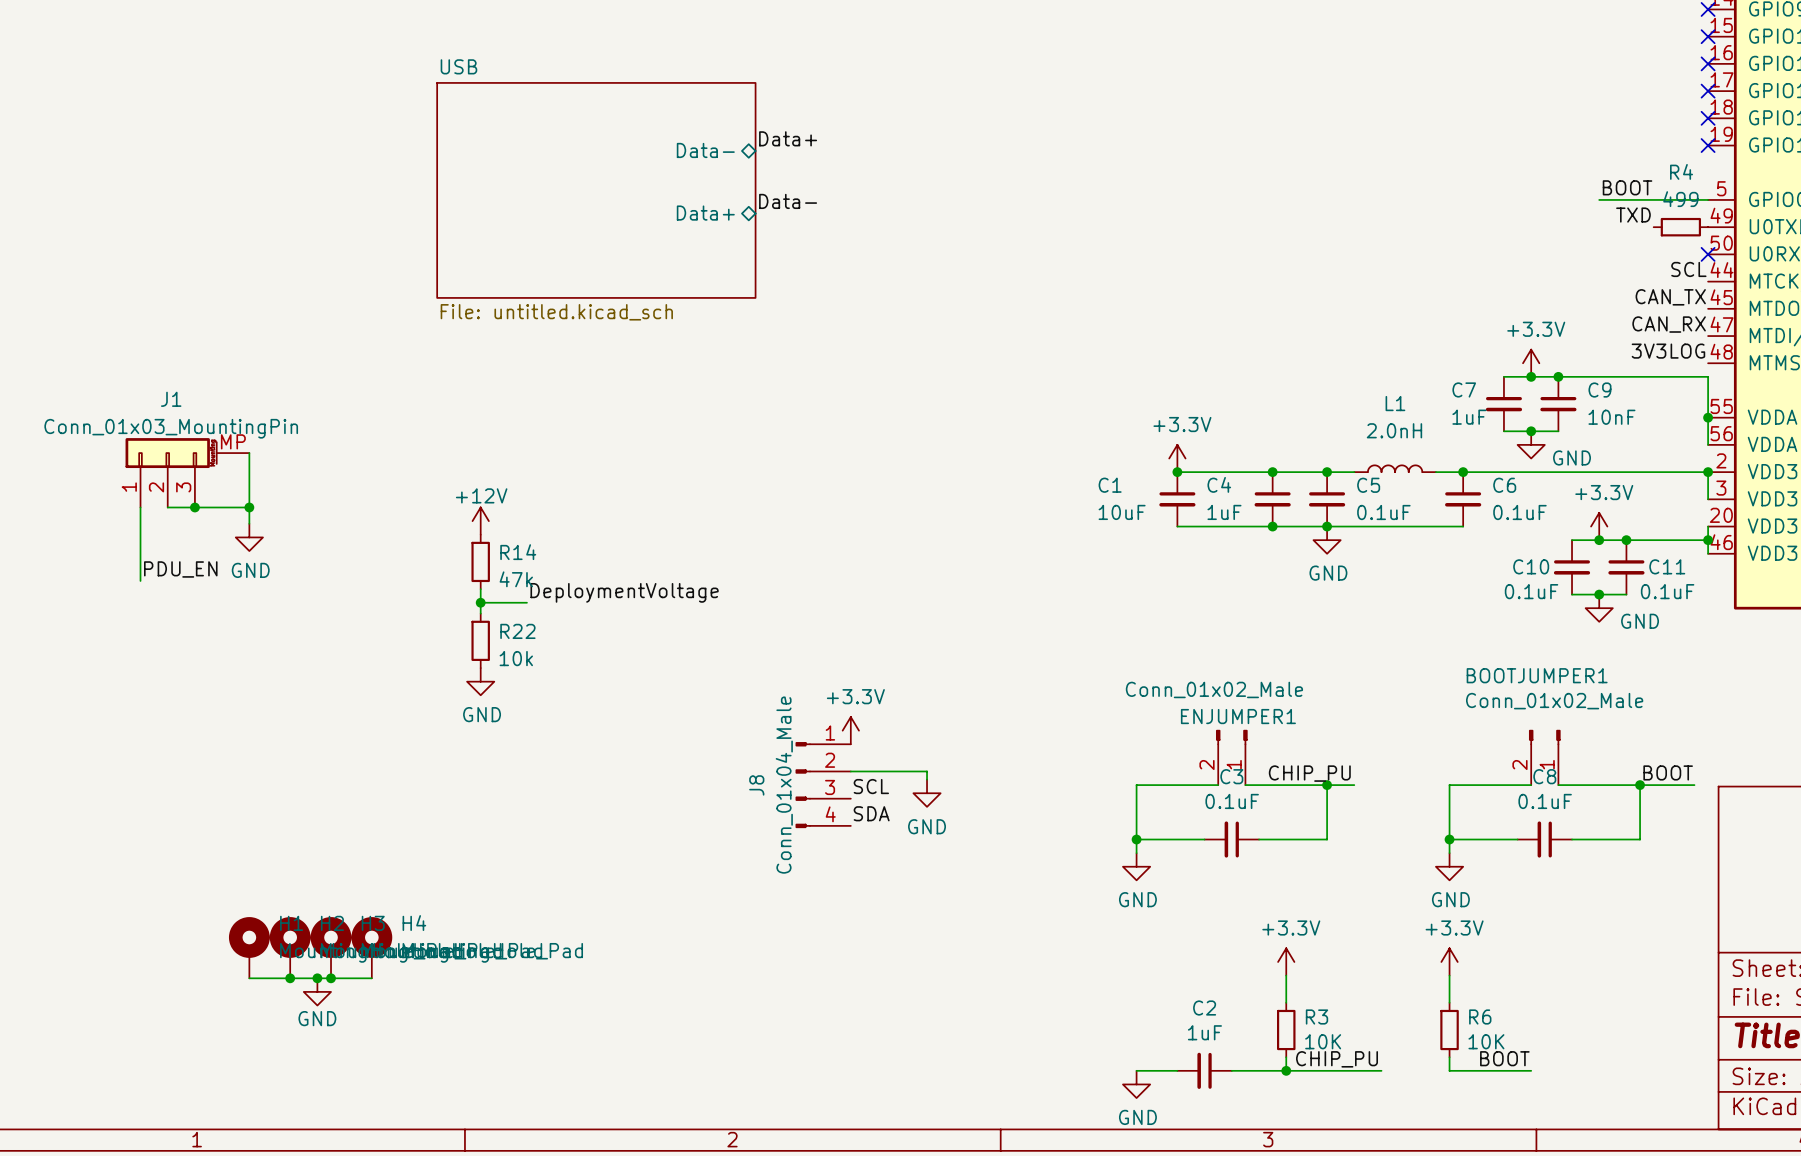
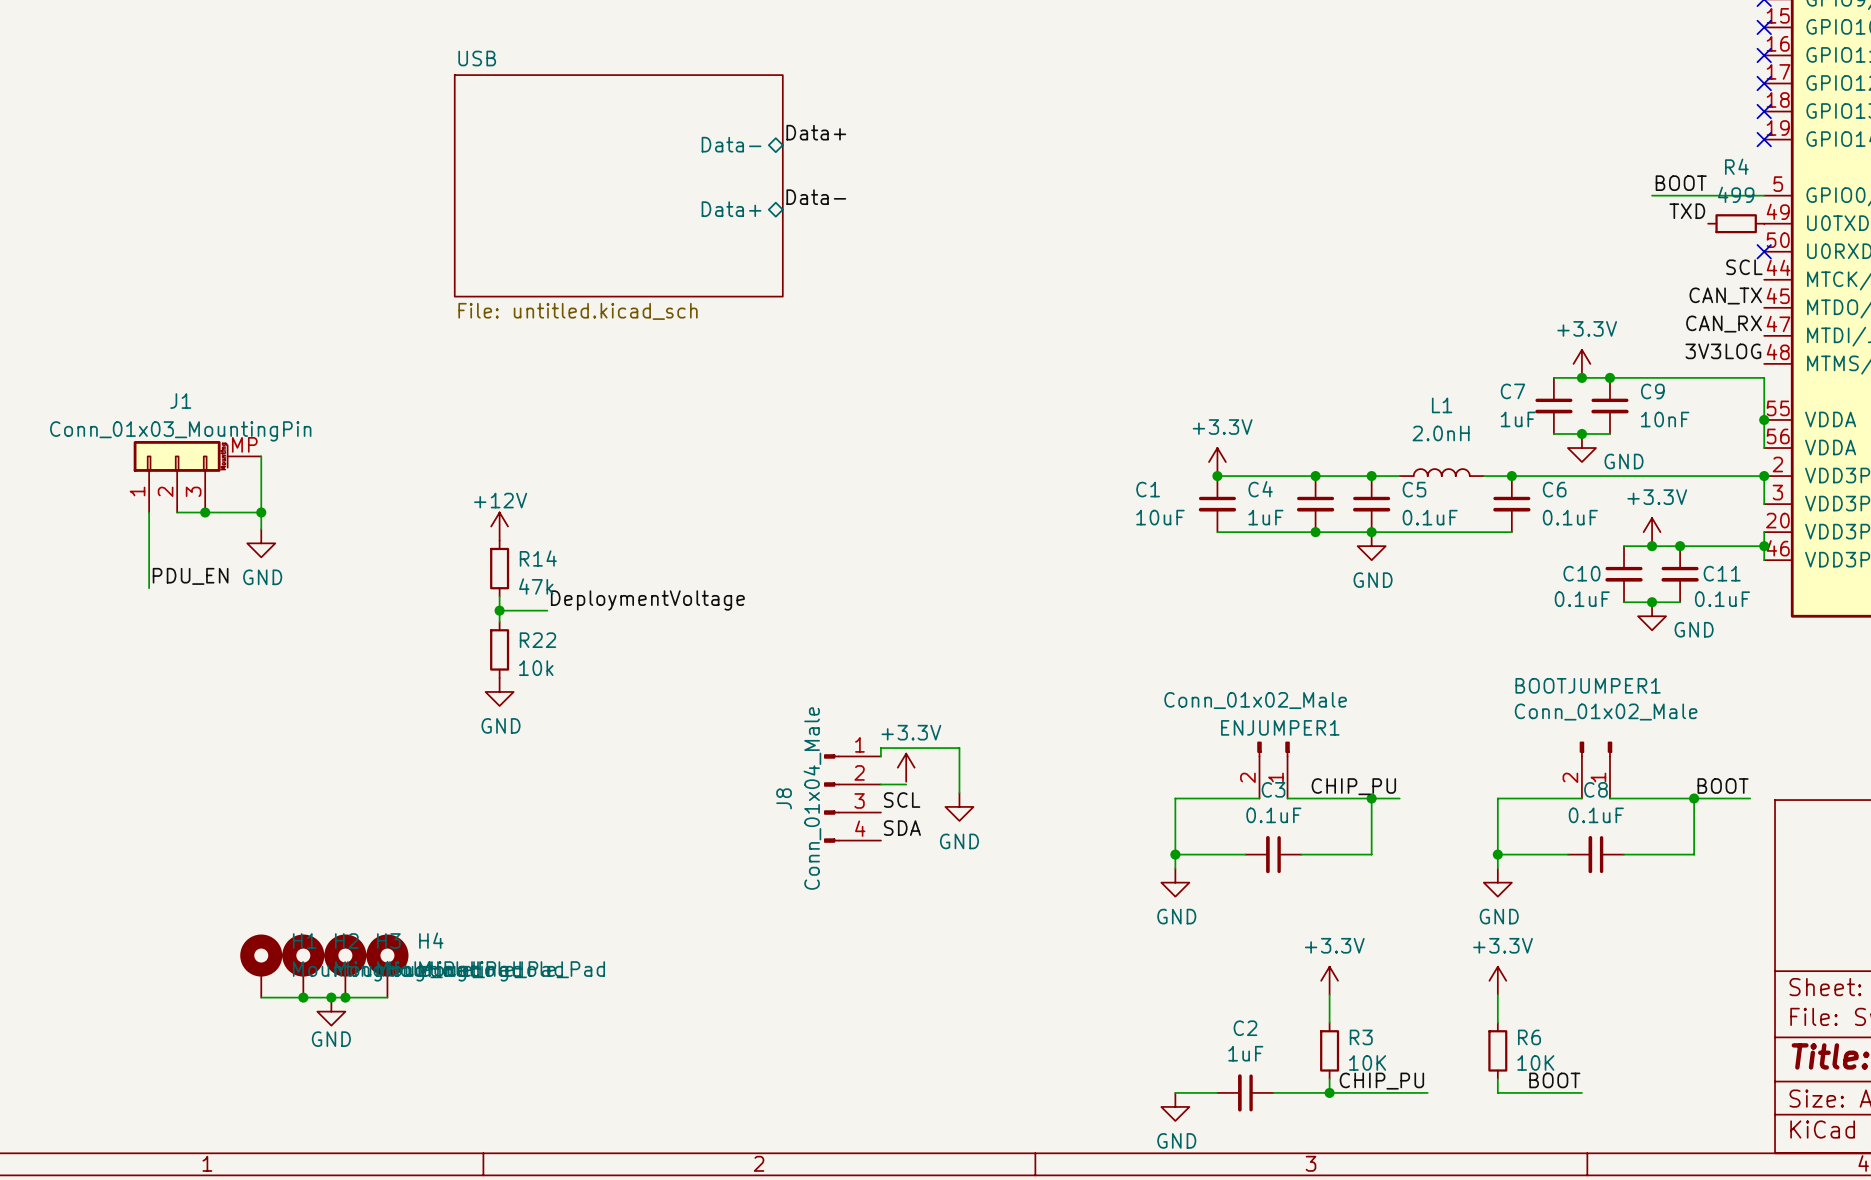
power symbol position: +3.3V (850, 730) -> +3.3V (906, 767)
wire: (875, 771) (927, 771) -> (880, 756) (880, 748) (959, 748) (959, 784)

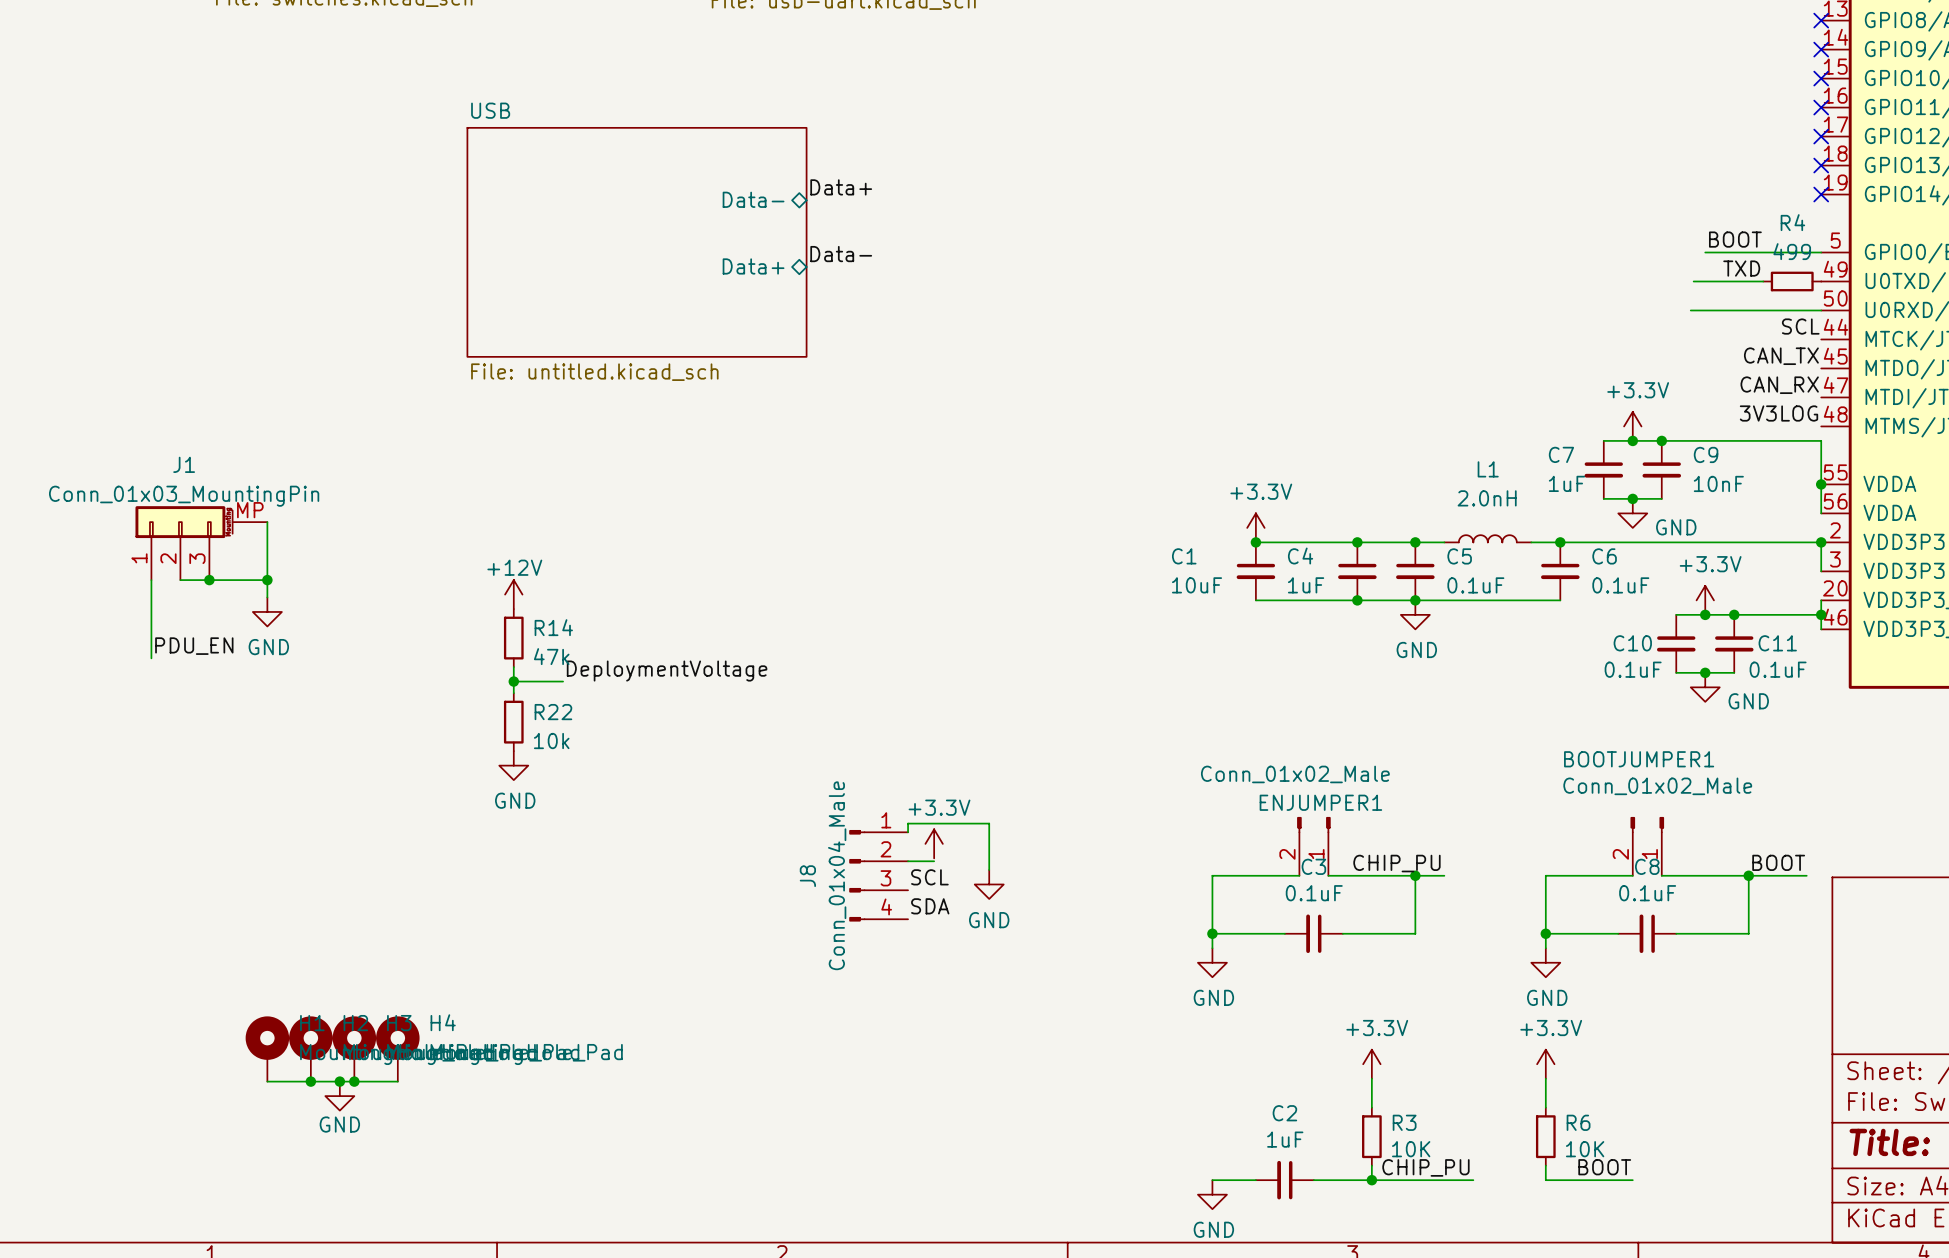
wire: none -> (1693, 281) (1763, 281)
wire: none -> (1690, 310) (1821, 310)
no-connect mark: (1764, 251) -> none

